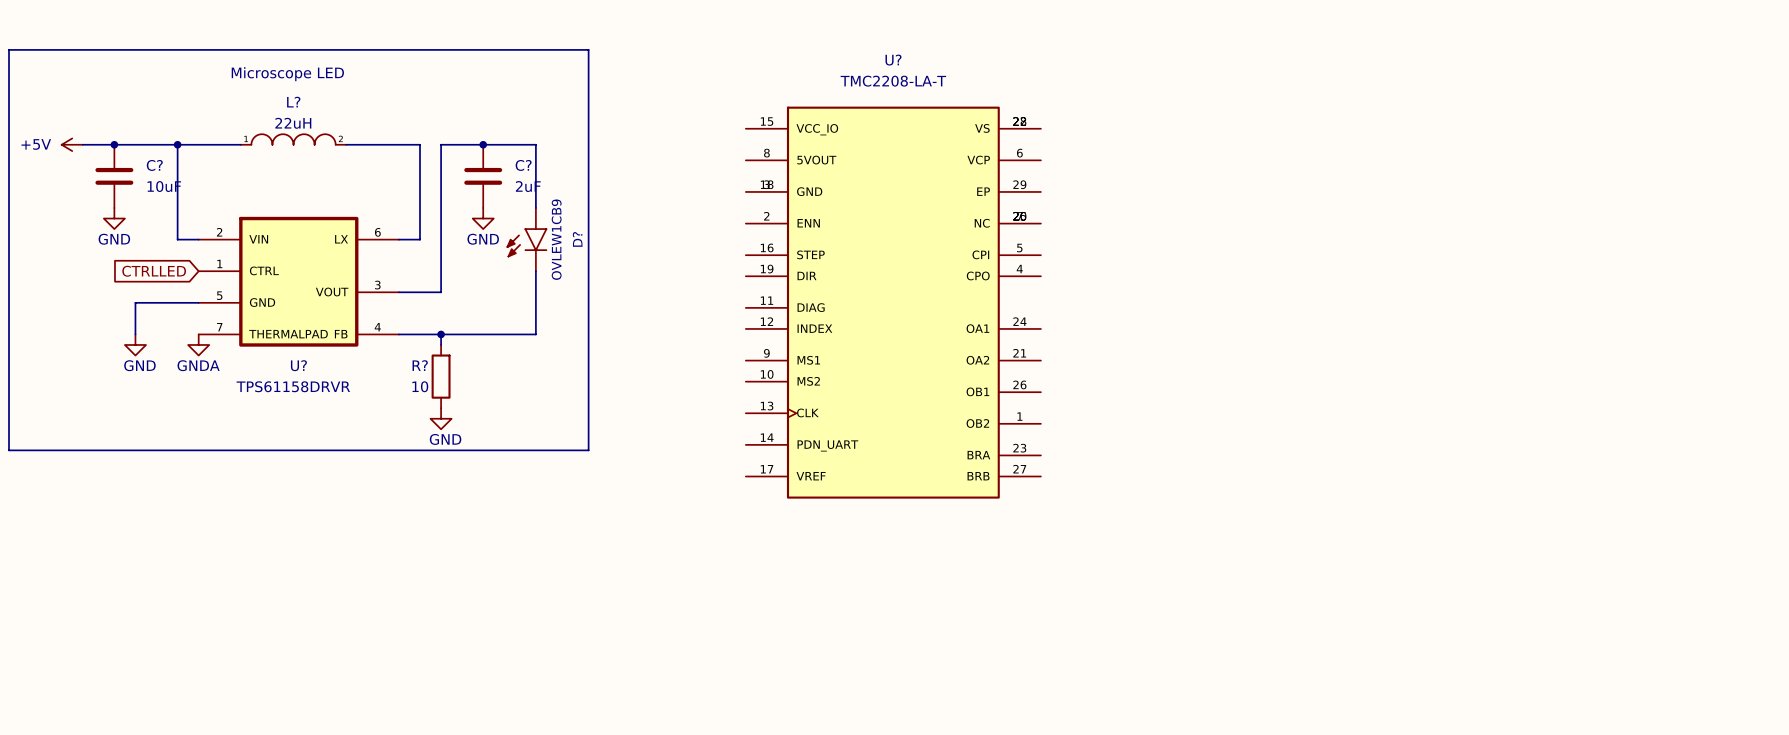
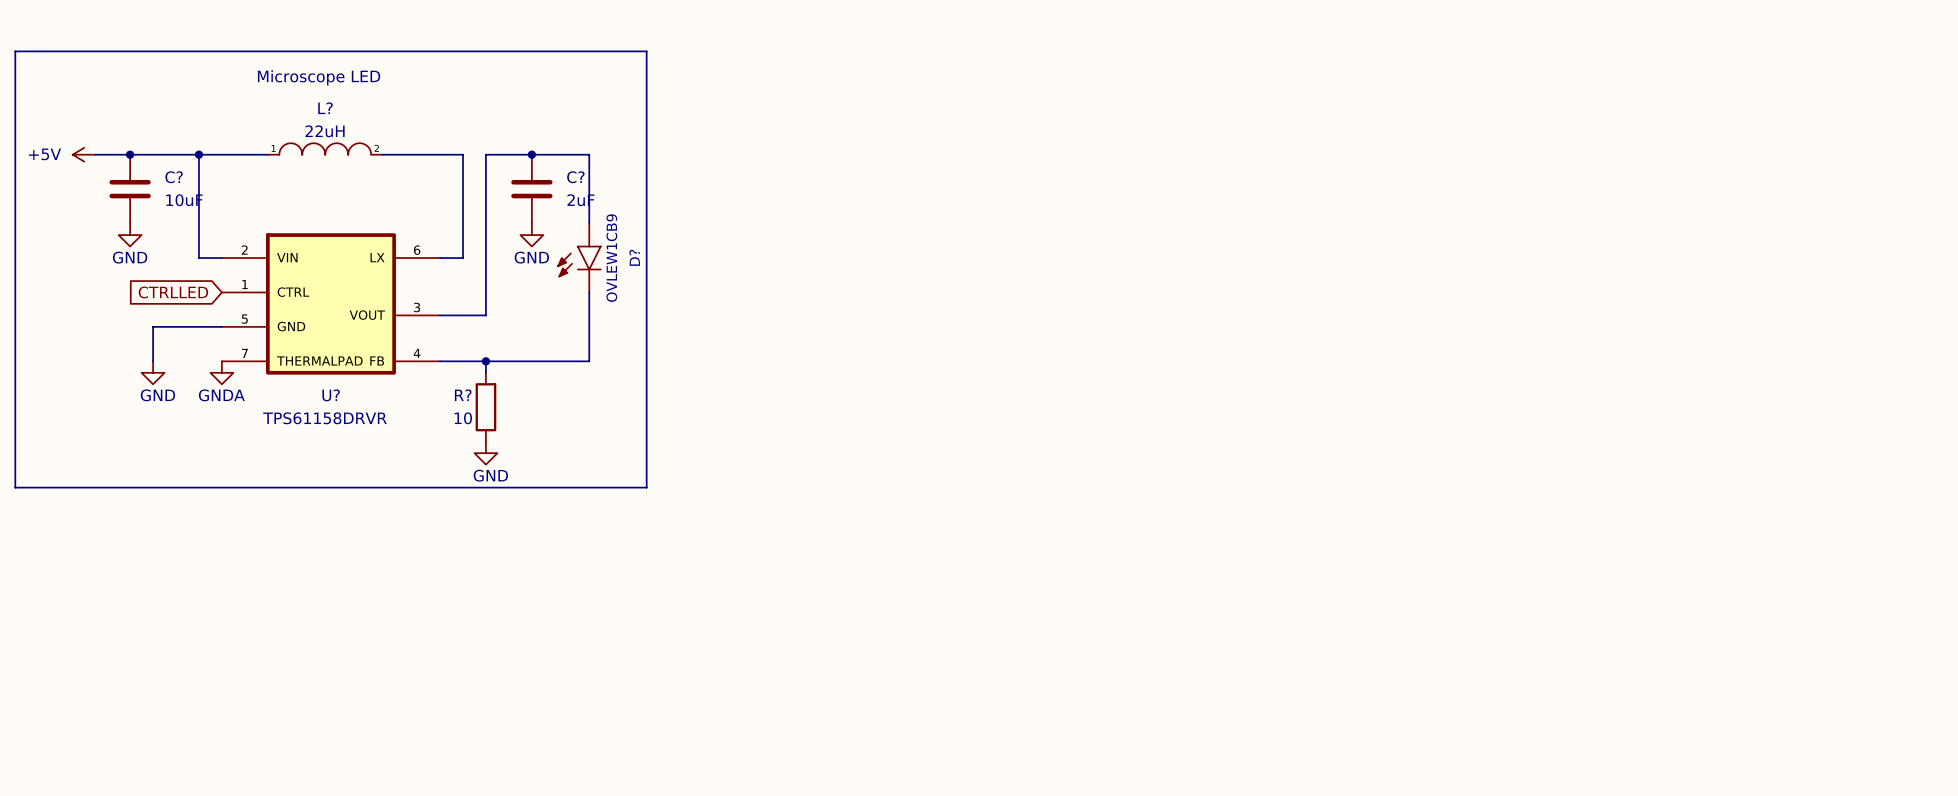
U?: TMC2208-LA-T (893, 302) -> none

